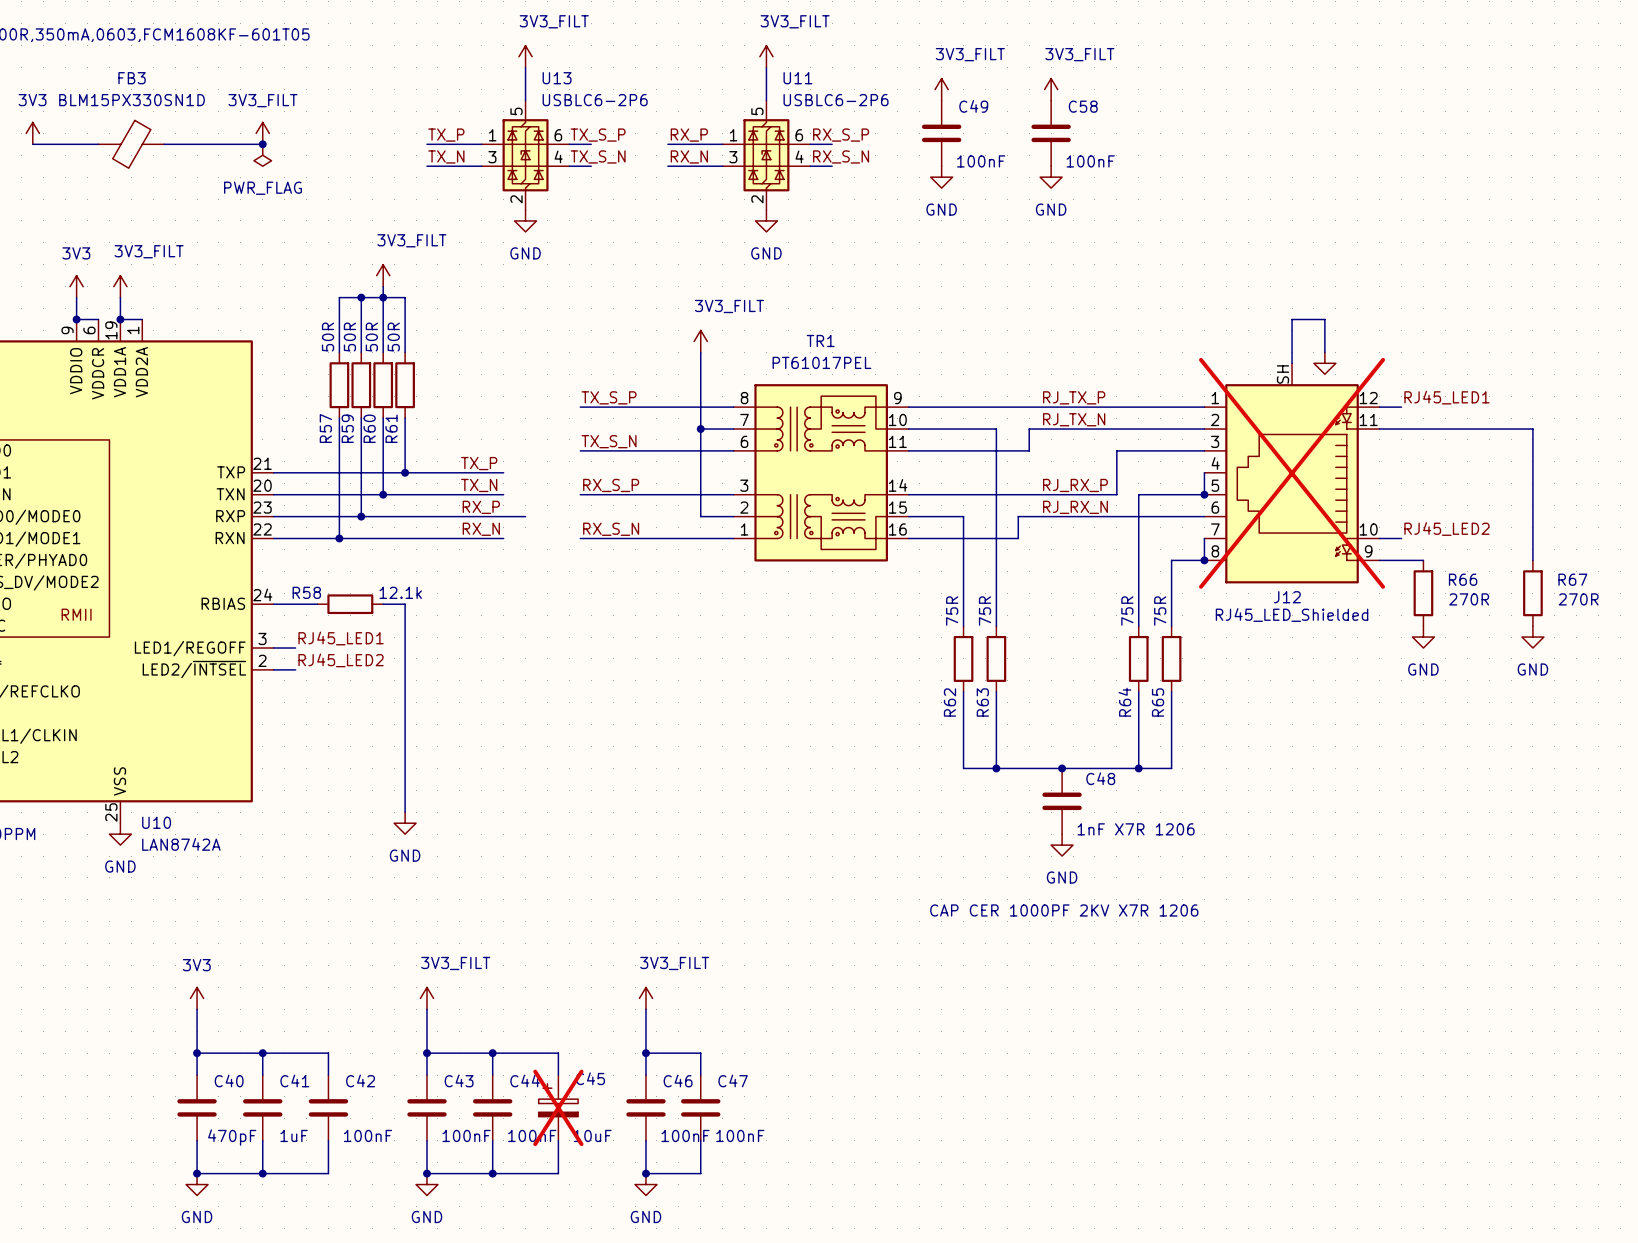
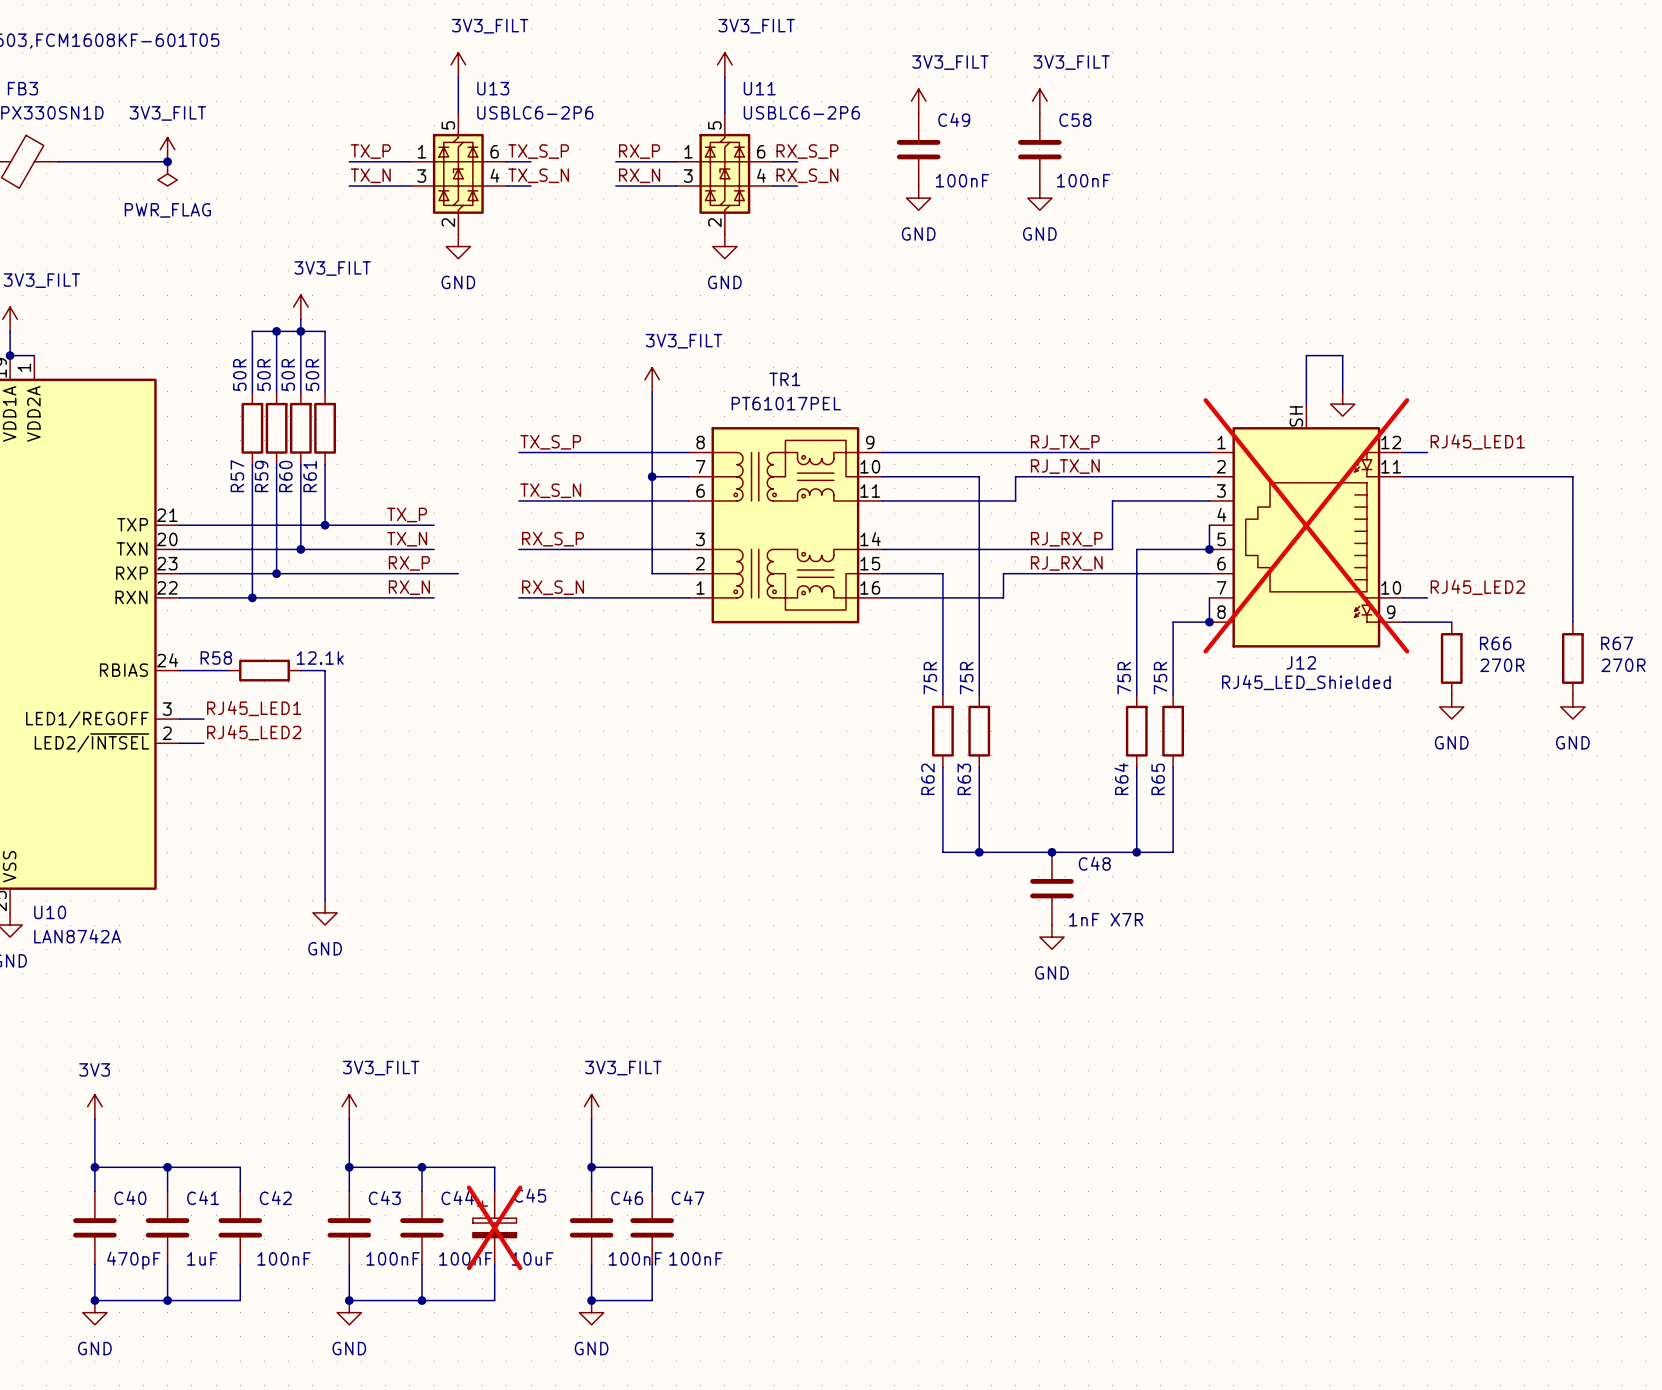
C48 value: 1nF X7R 1206 (1136, 829) -> 1nF X7R (1106, 919)
text: CAP CER 1000PF 2KV X7R 1206 (1064, 910) -> none

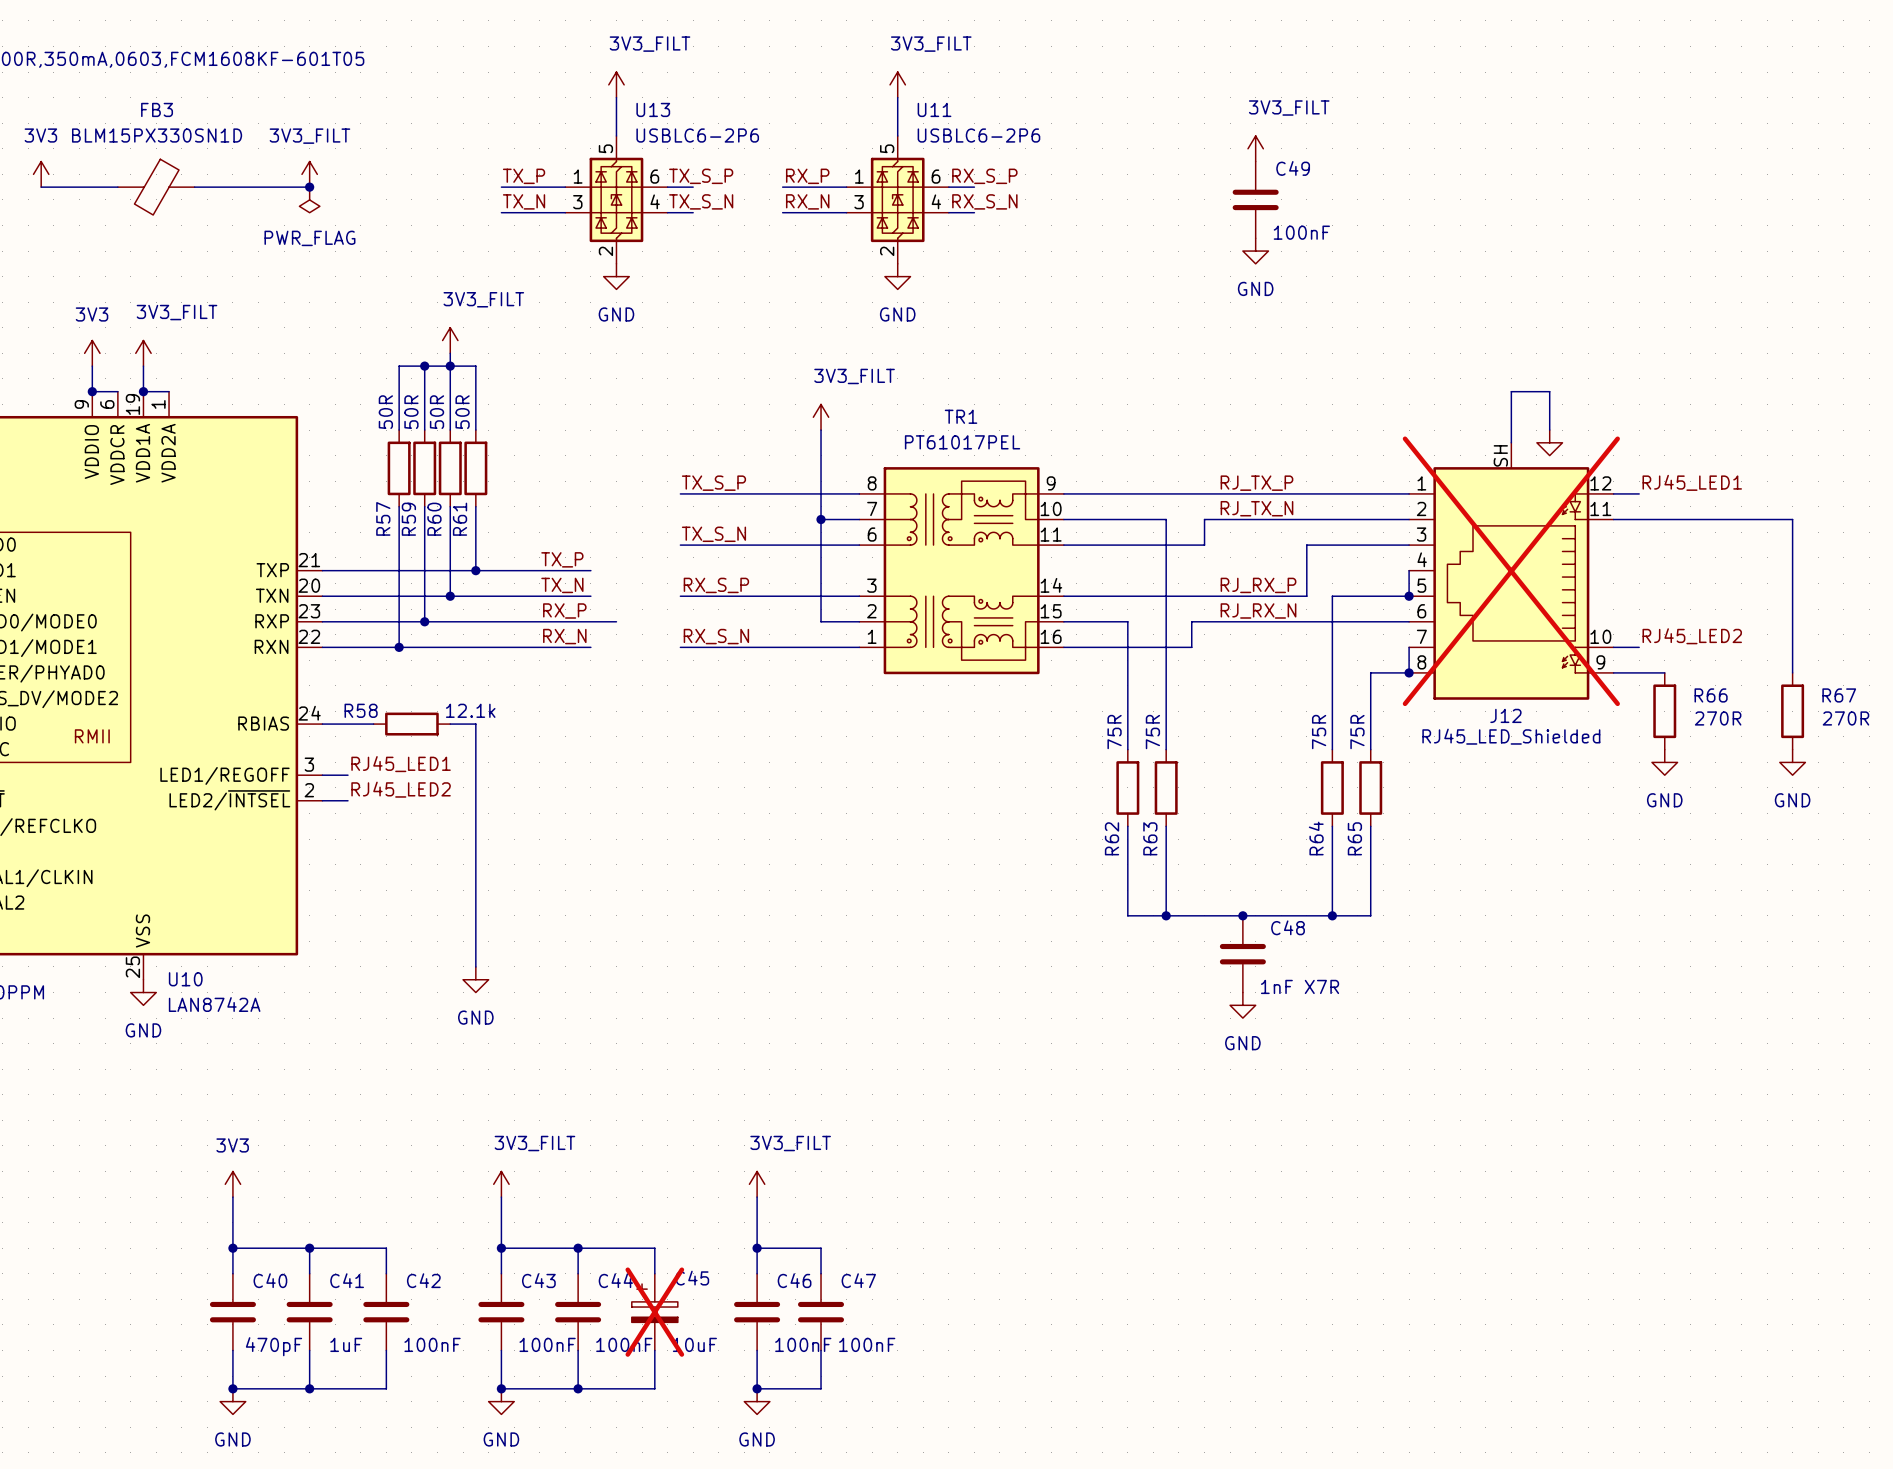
power symbol: 3V3_FILT (918, 101) -> none
power symbol position: 3V3_FILT (1039, 101) -> 3V3_FILT (1255, 148)
C49 position: (918, 149) -> (1255, 199)
C58: 100nF (1039, 149) -> none
power symbol: GND (918, 198) -> none
power symbol position: GND (1039, 198) -> GND (1255, 251)

